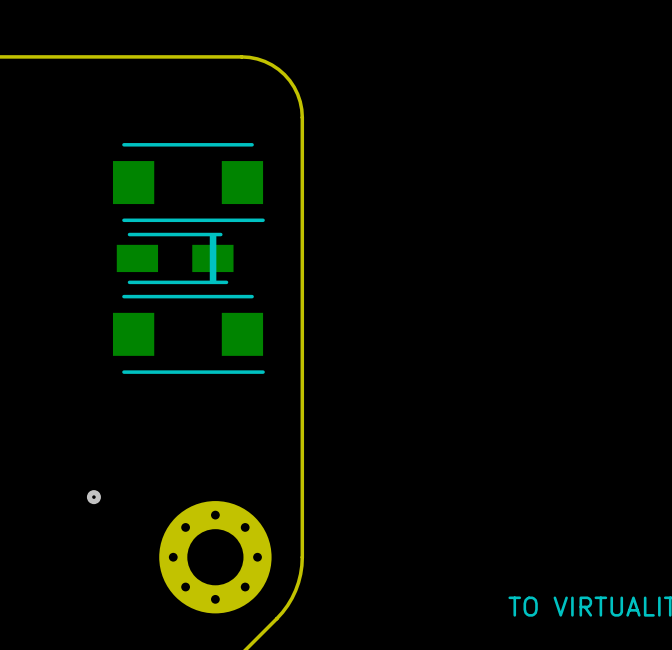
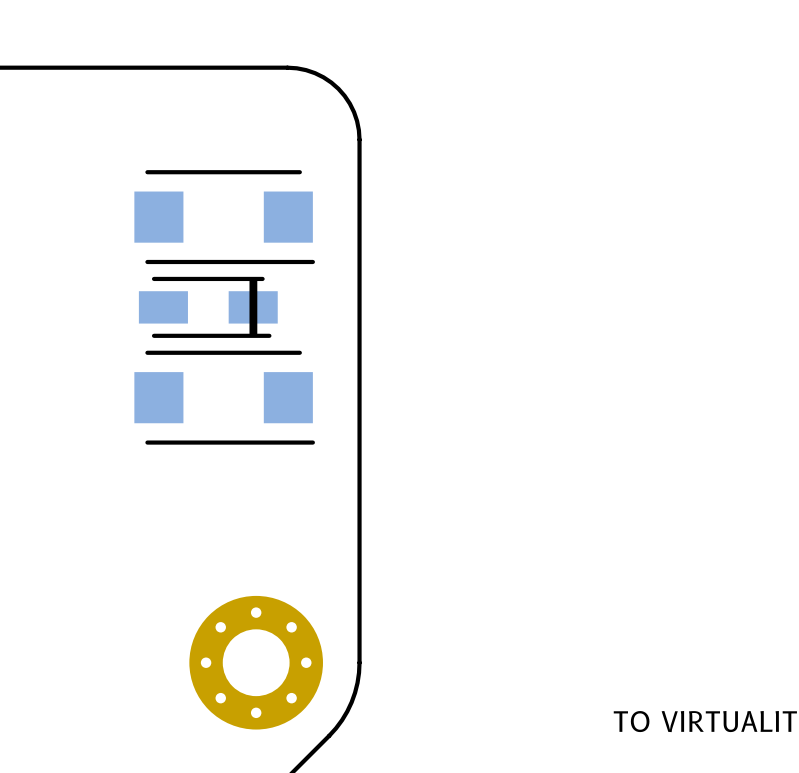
via: (93, 497) -> none

